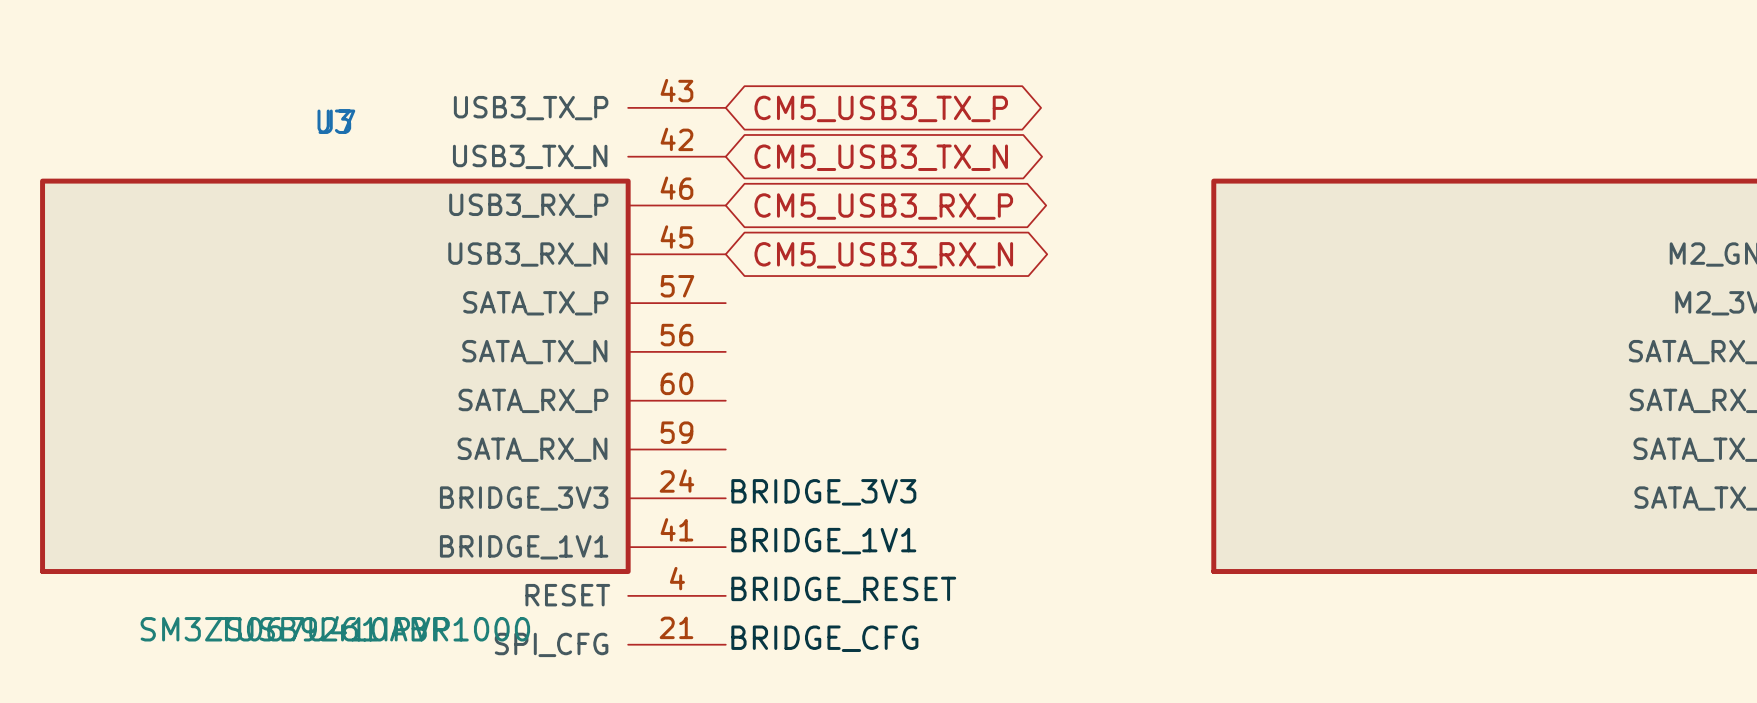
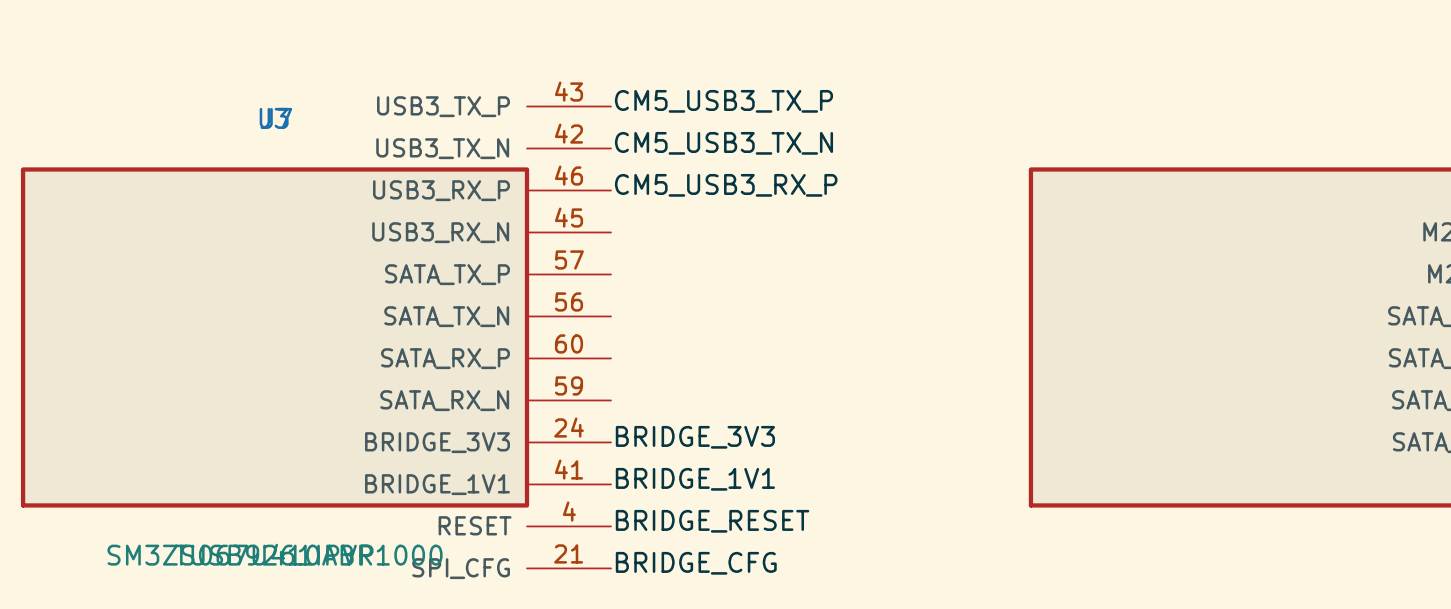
label: none -> CM5_USB3_TX_P (723, 101)
global label: CM5_USB3_TX_P (881, 108) -> none
label: none -> CM5_USB3_TX_N (723, 143)
global label: CM5_USB3_TX_N (881, 157) -> none
label: none -> CM5_USB3_RX_P (726, 185)
global label: CM5_USB3_RX_P (883, 206) -> none
global label: CM5_USB3_RX_N (883, 255) -> none

